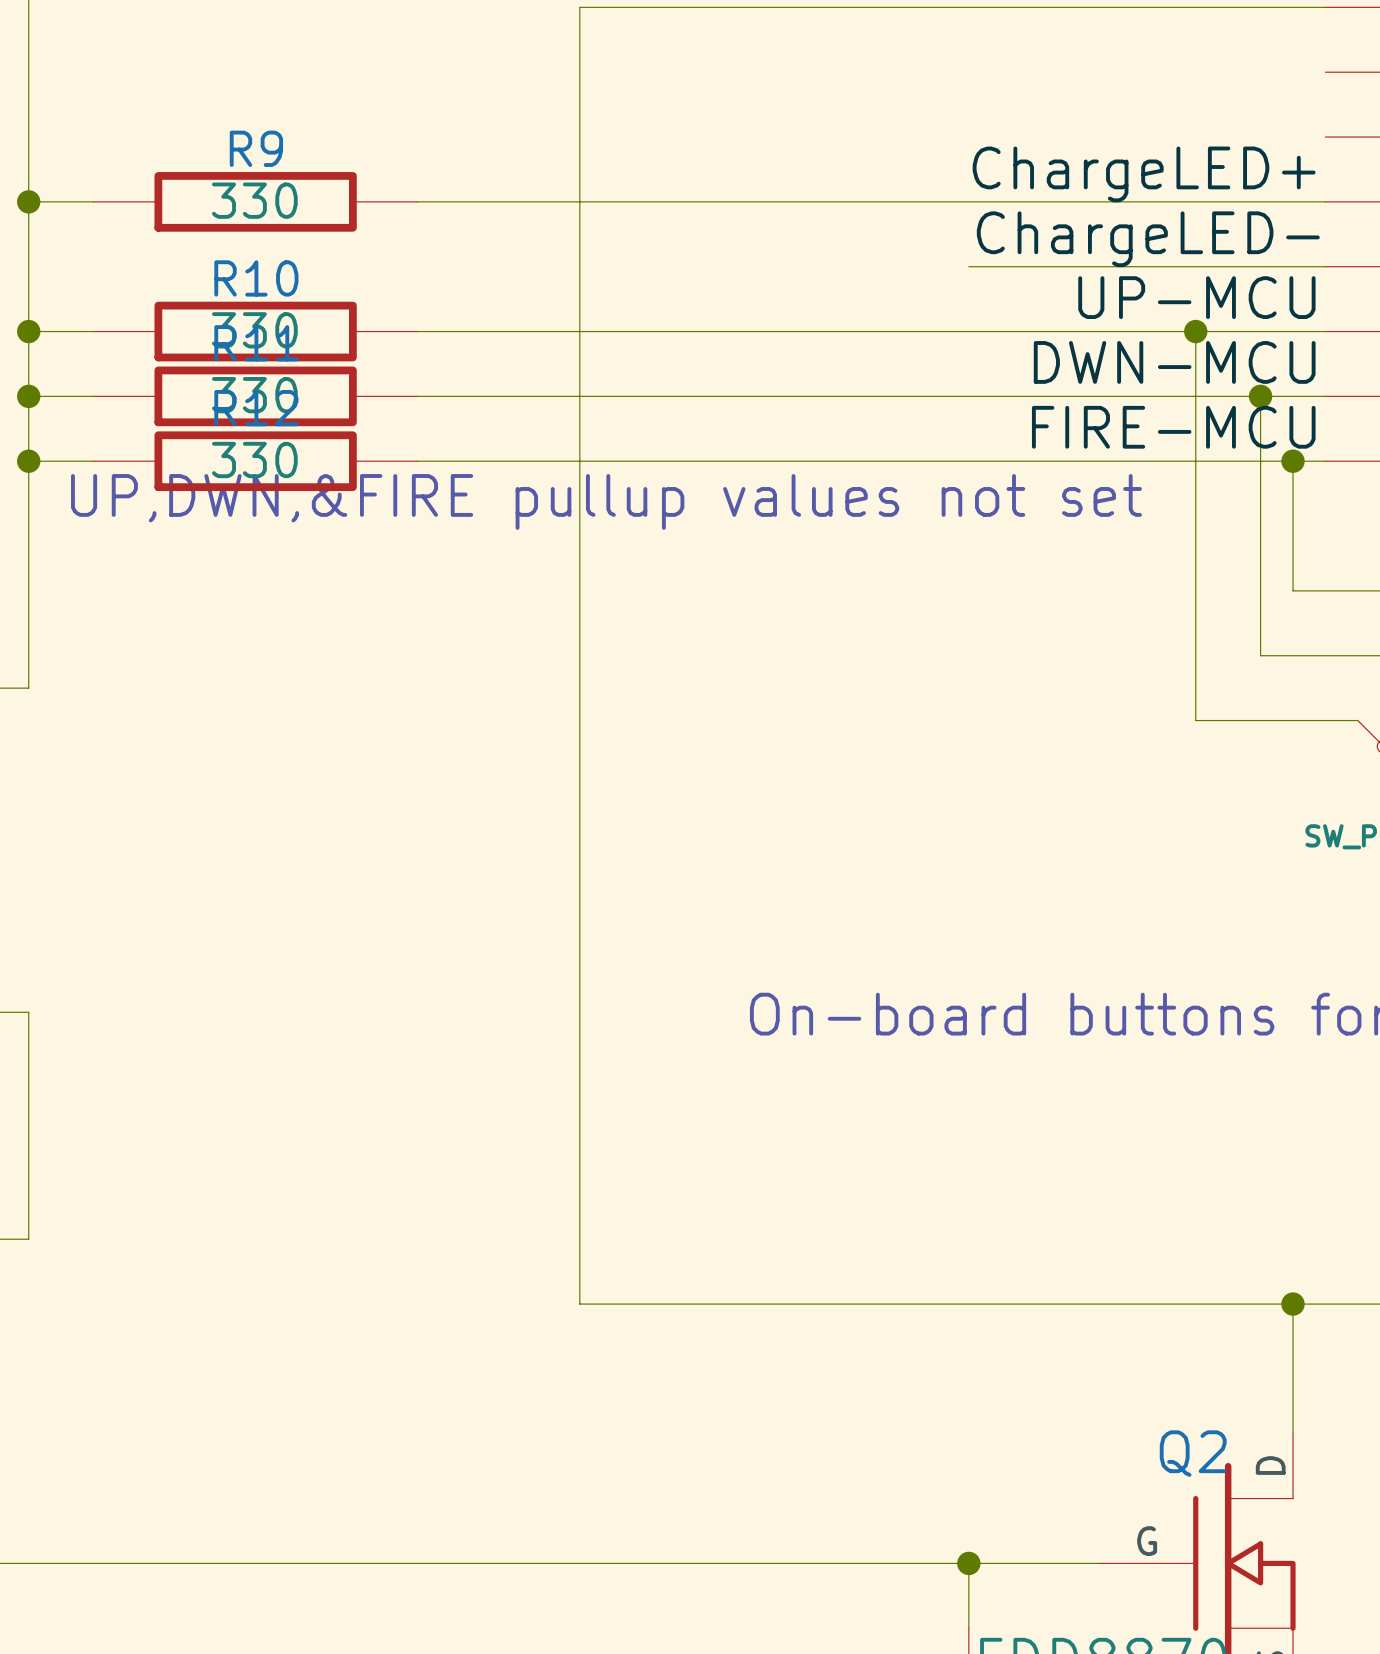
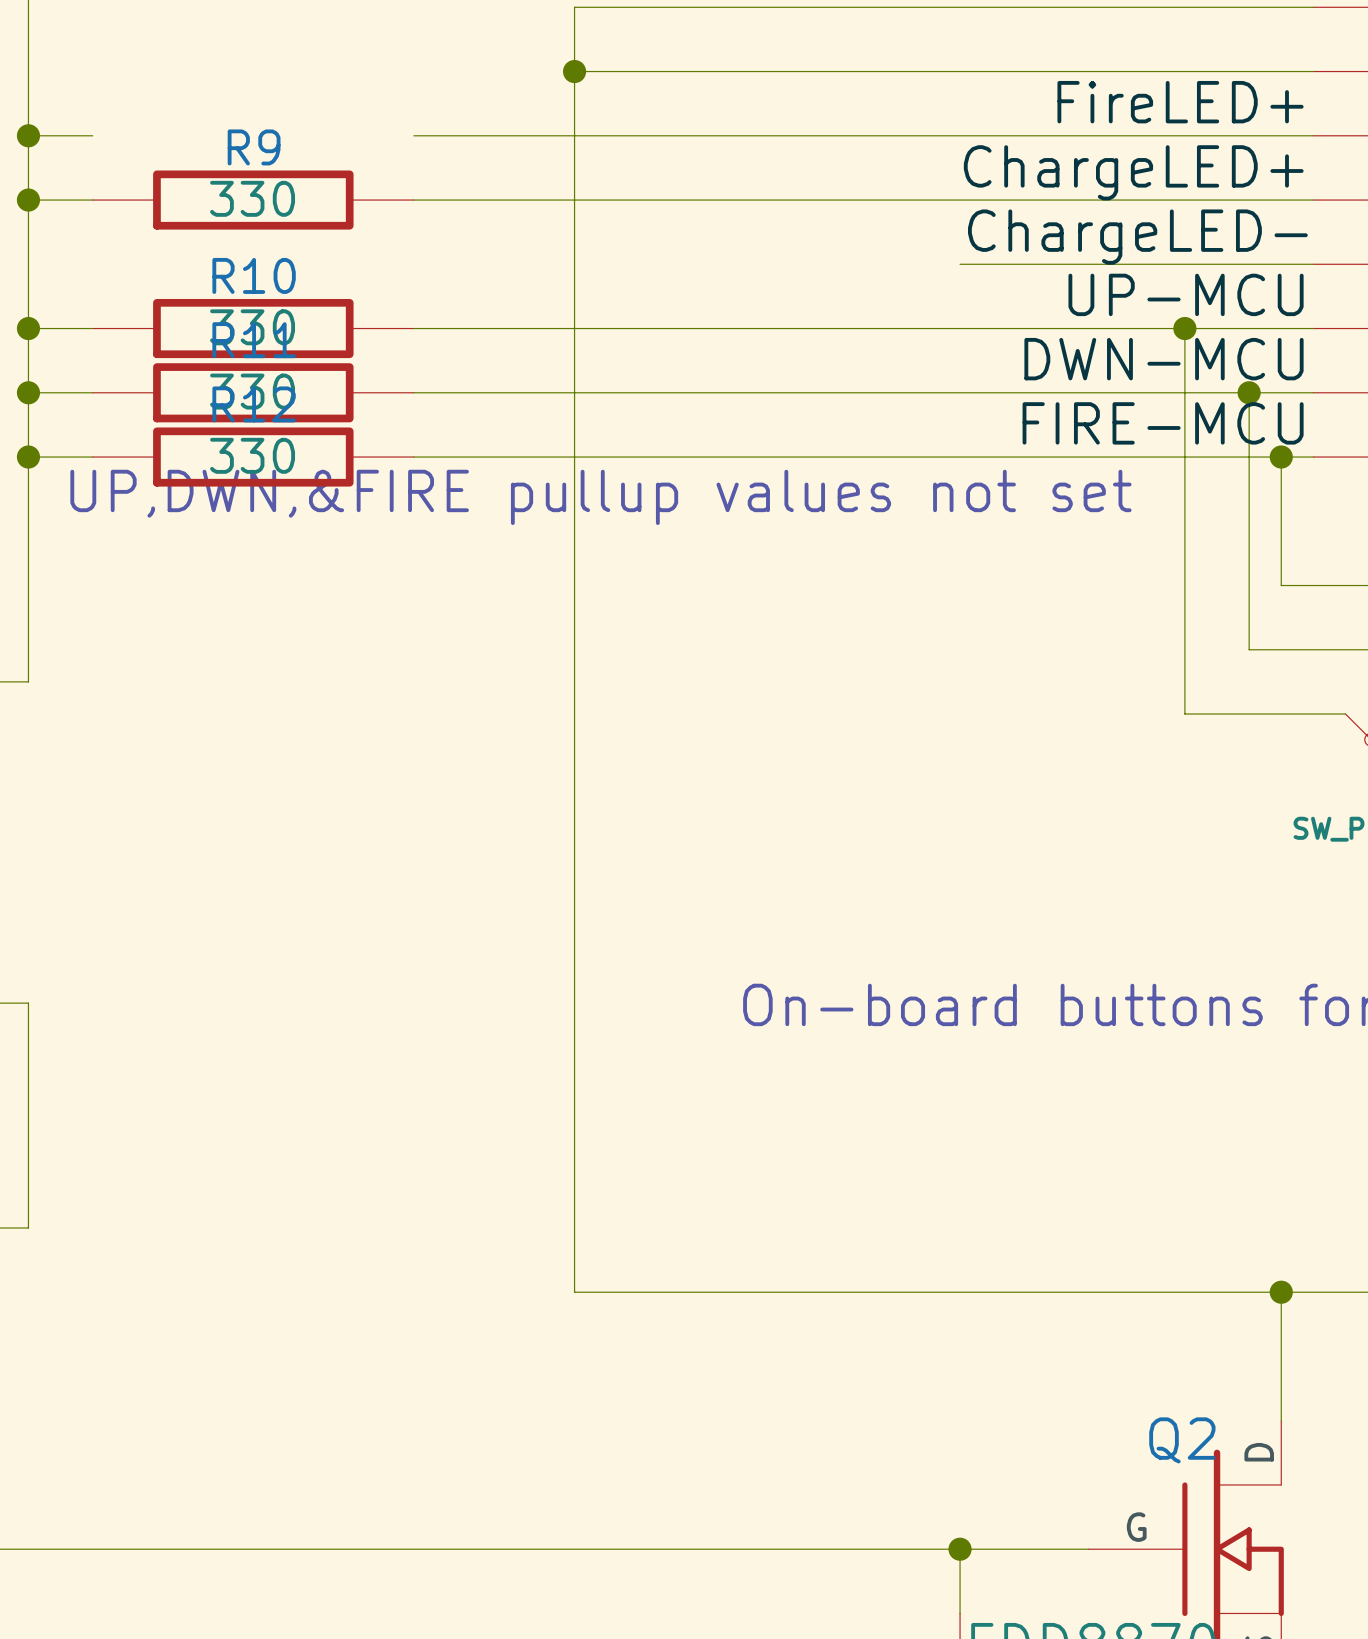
wire: none -> (574, 71) (1313, 71)
junction: none -> (574, 71)
label: none -> FireLED+ (1180, 102)
wire: none -> (28, 135) (92, 135)
junction: none -> (28, 135)
wire: none -> (413, 135) (1313, 135)

